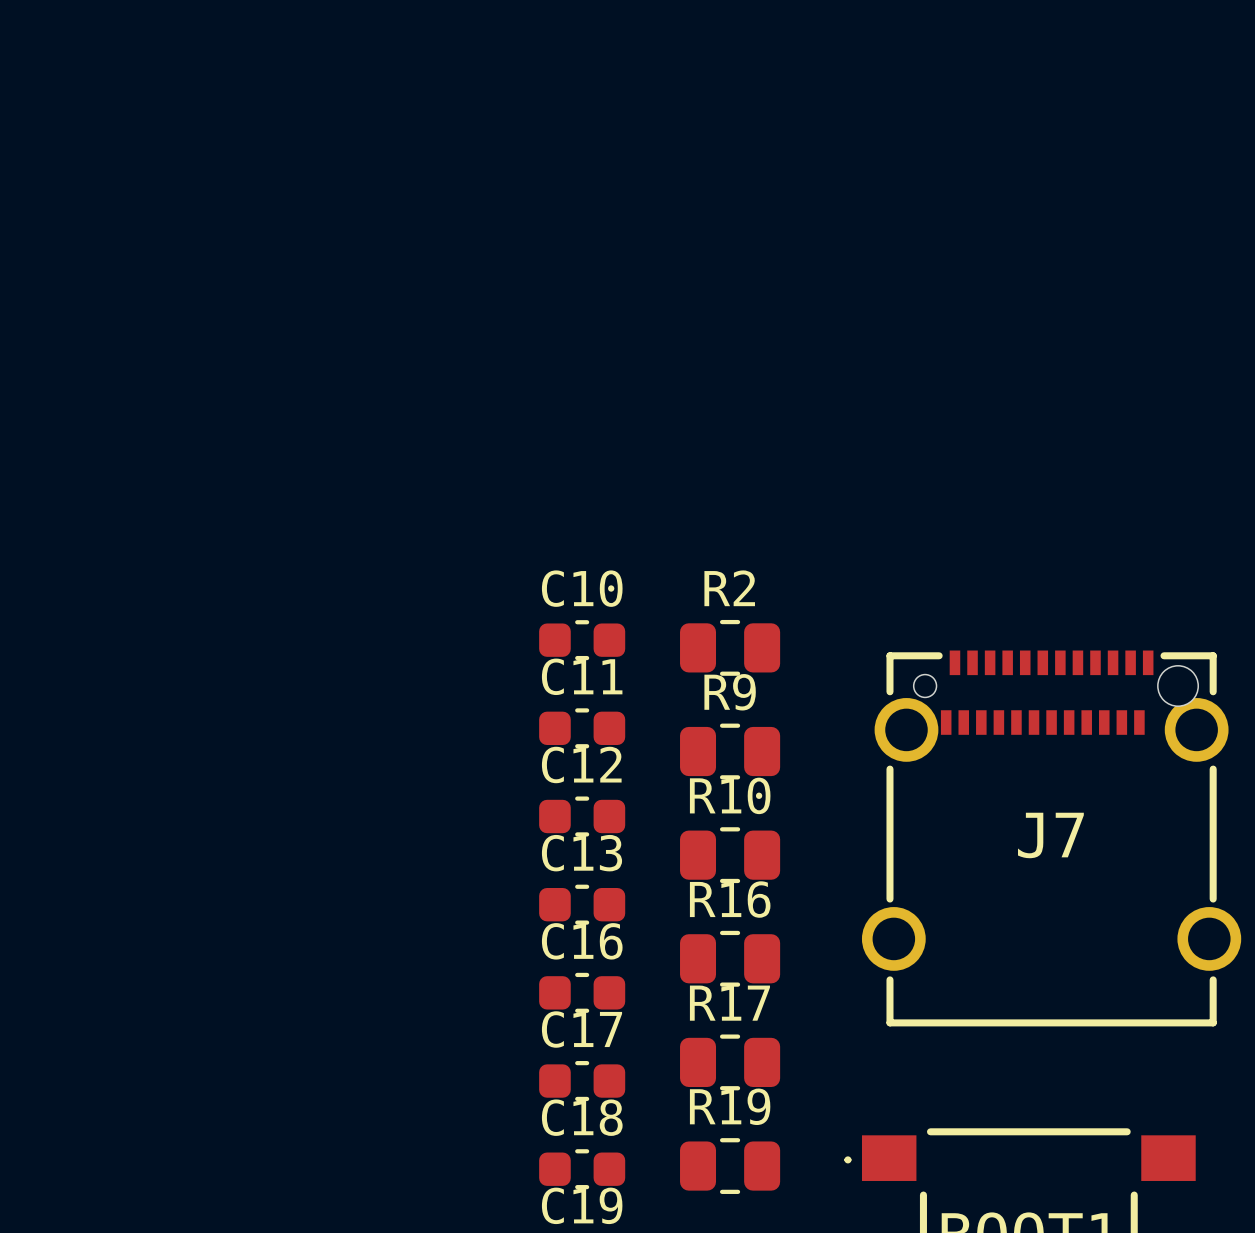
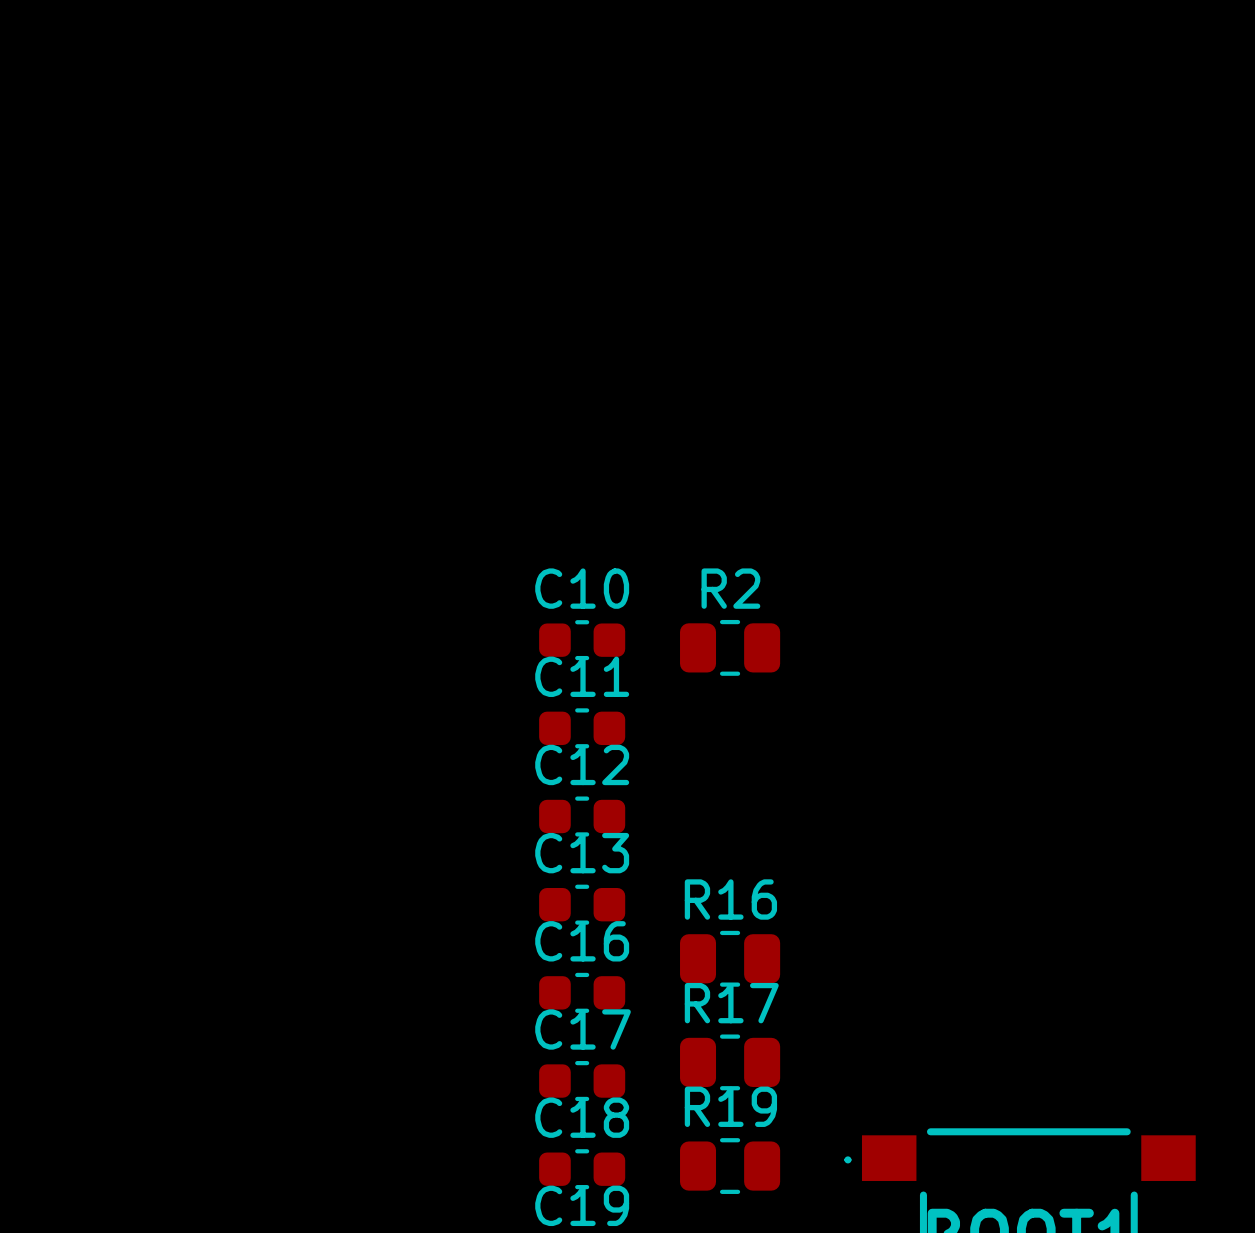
R9: (730, 751) -> none
J7: (1051, 838) -> none
R10: (730, 855) -> none

